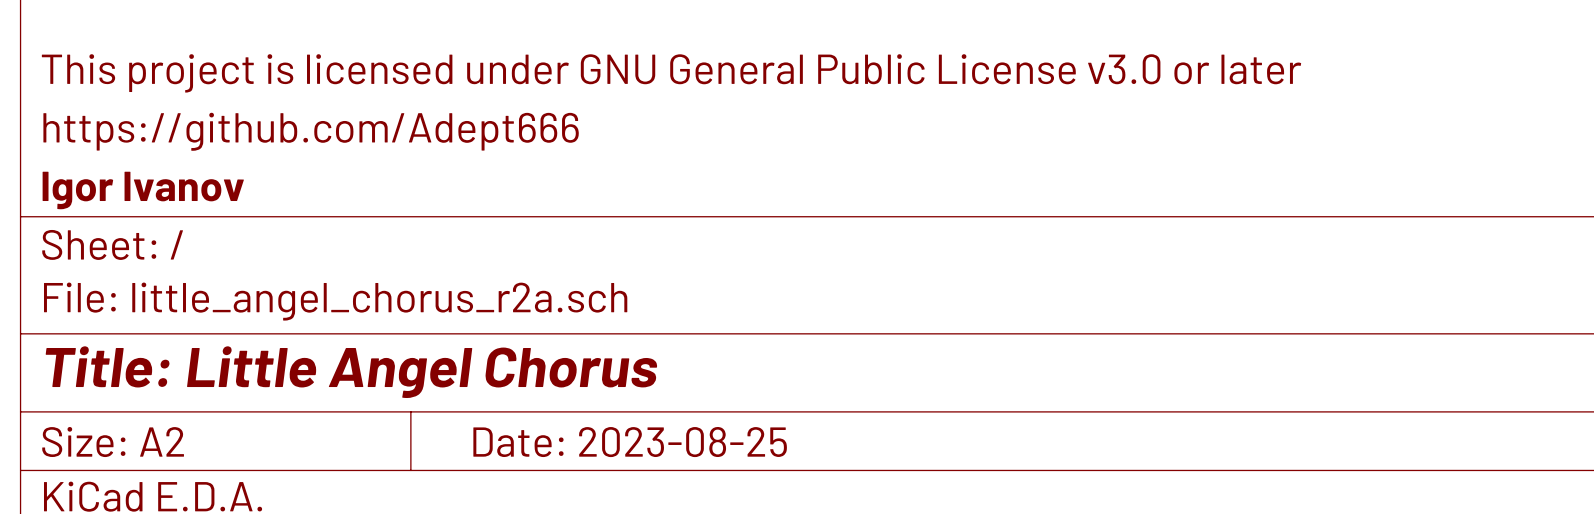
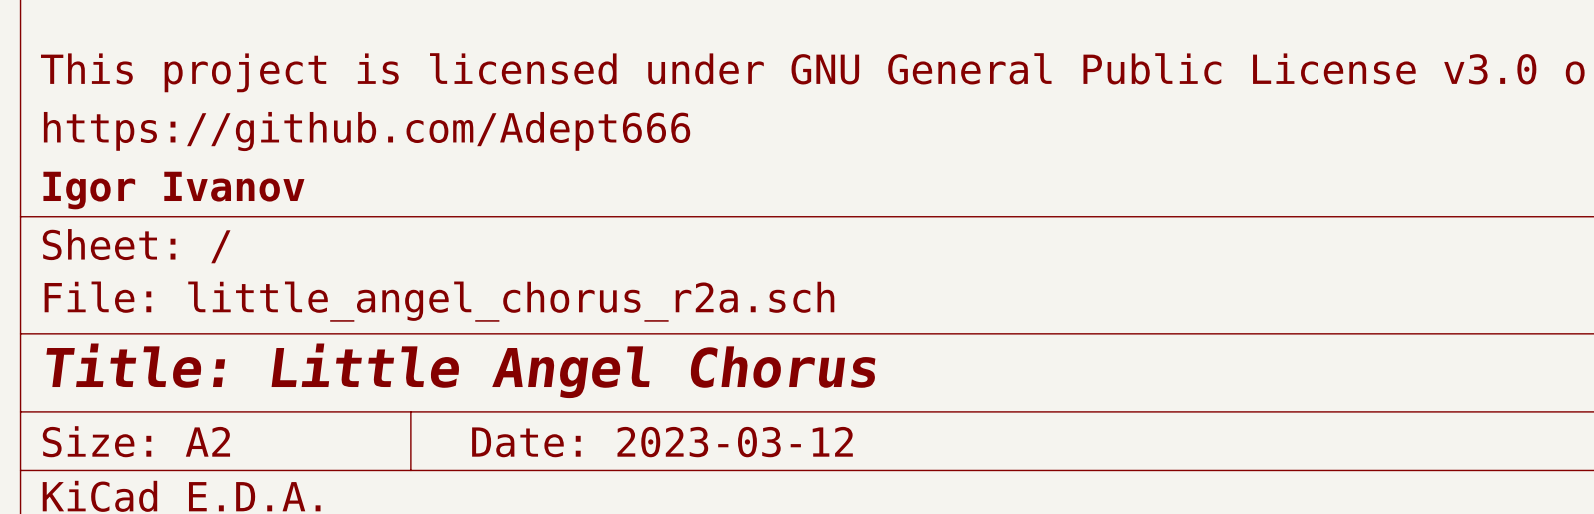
title block: Date: 2023-08-25 (630, 442) -> Date: 2023-03-12 (662, 442)

